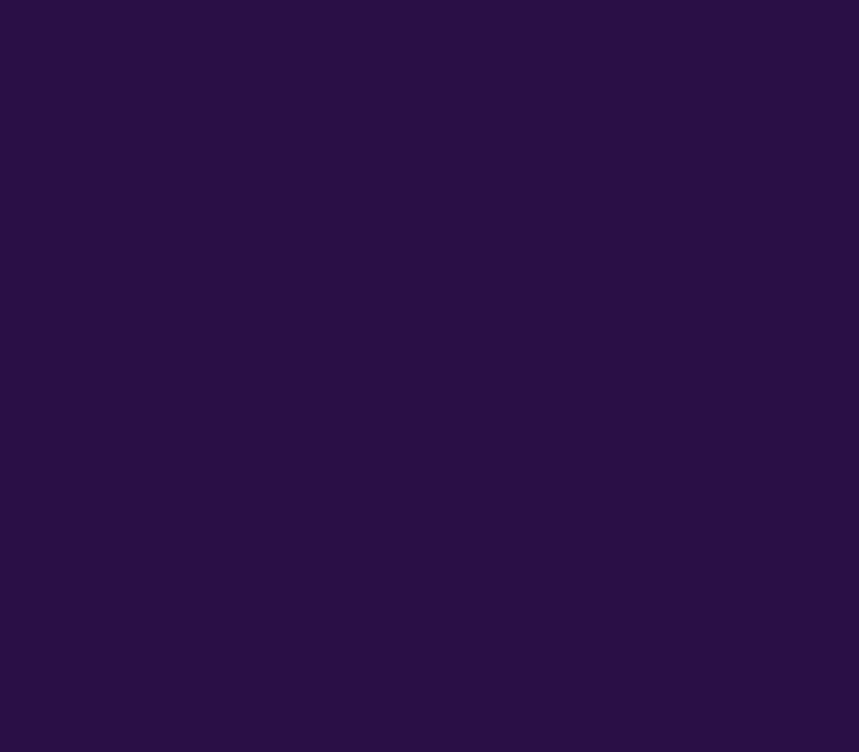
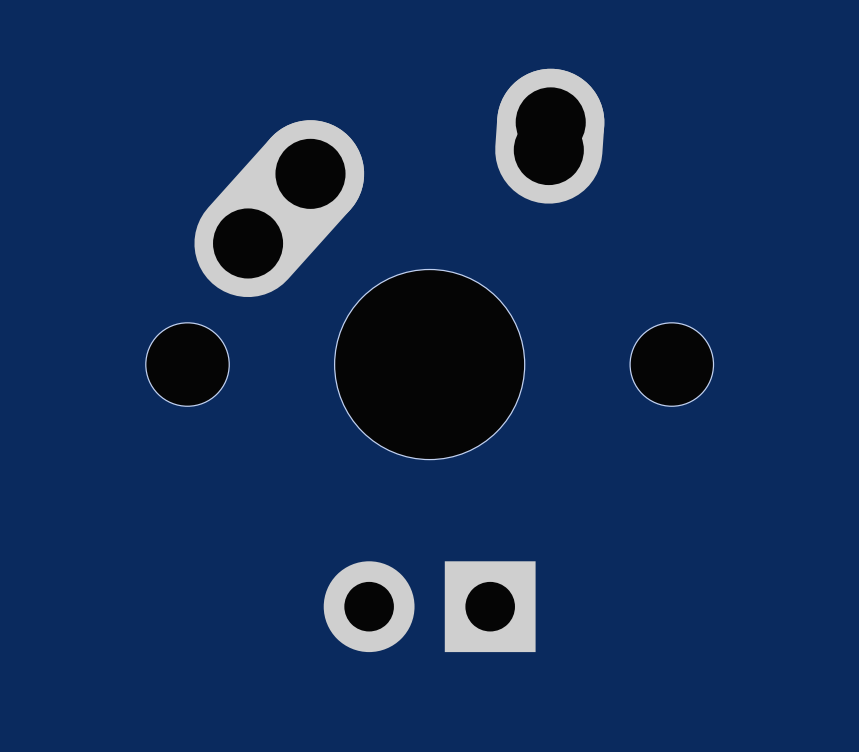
part: none -> (429, 360)

